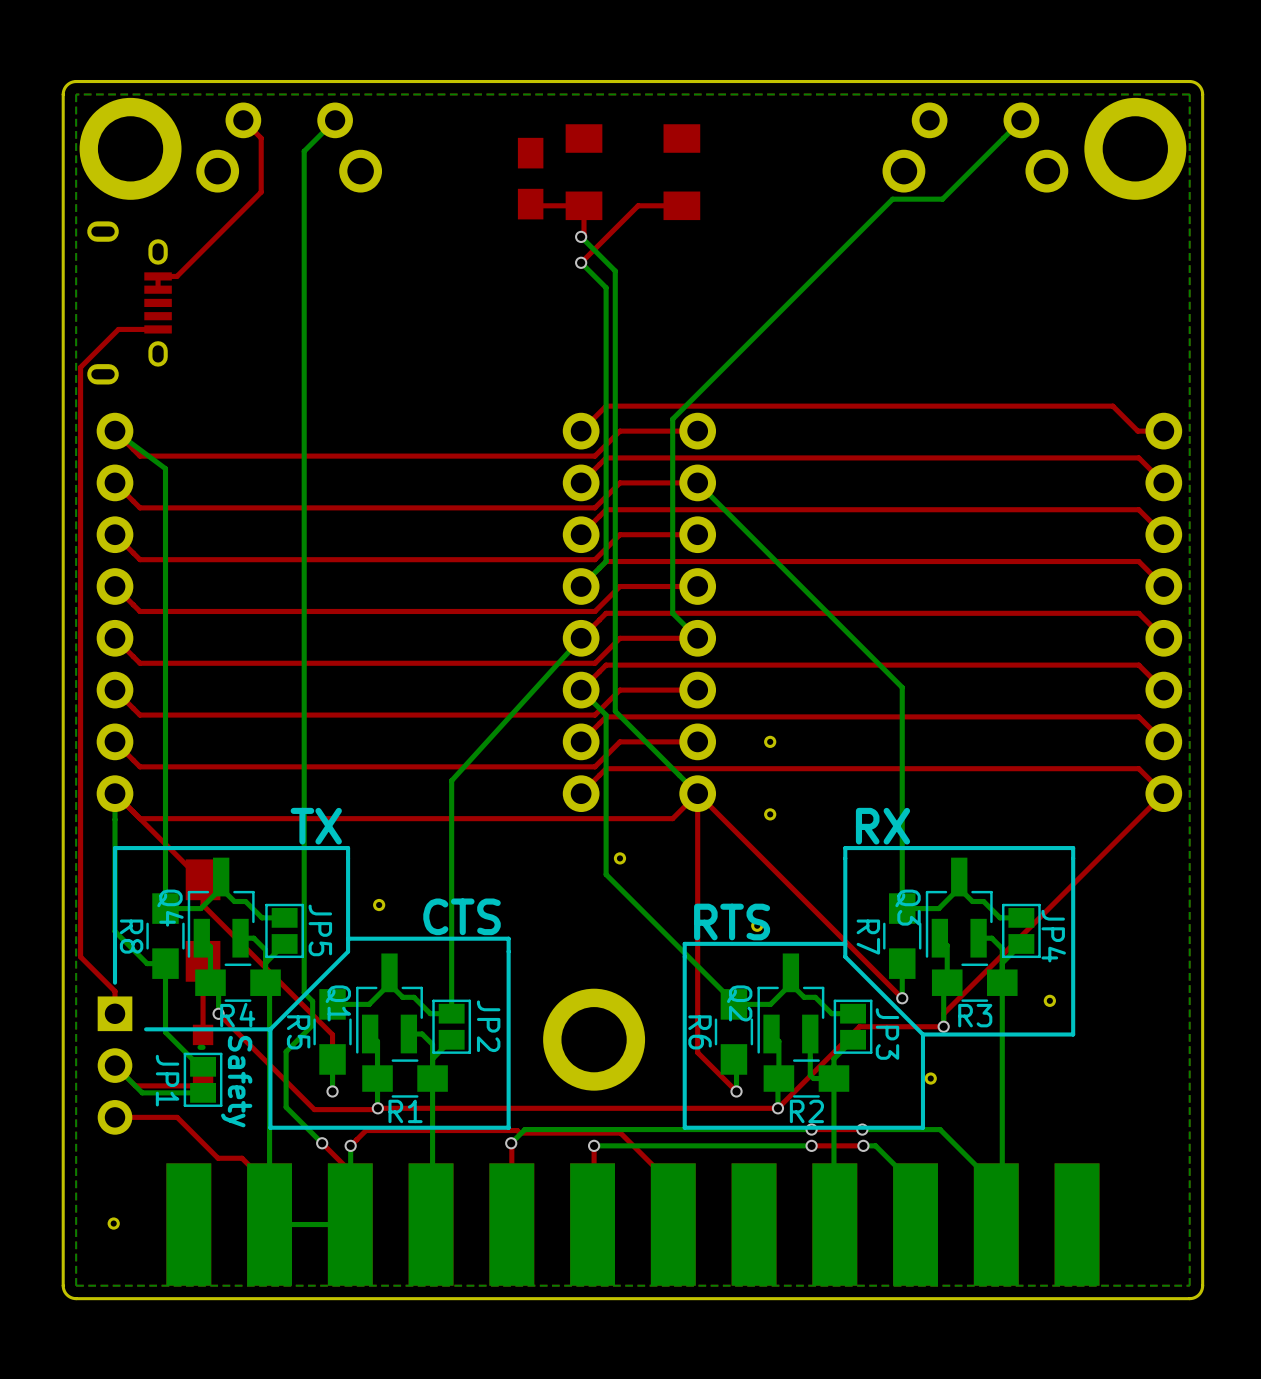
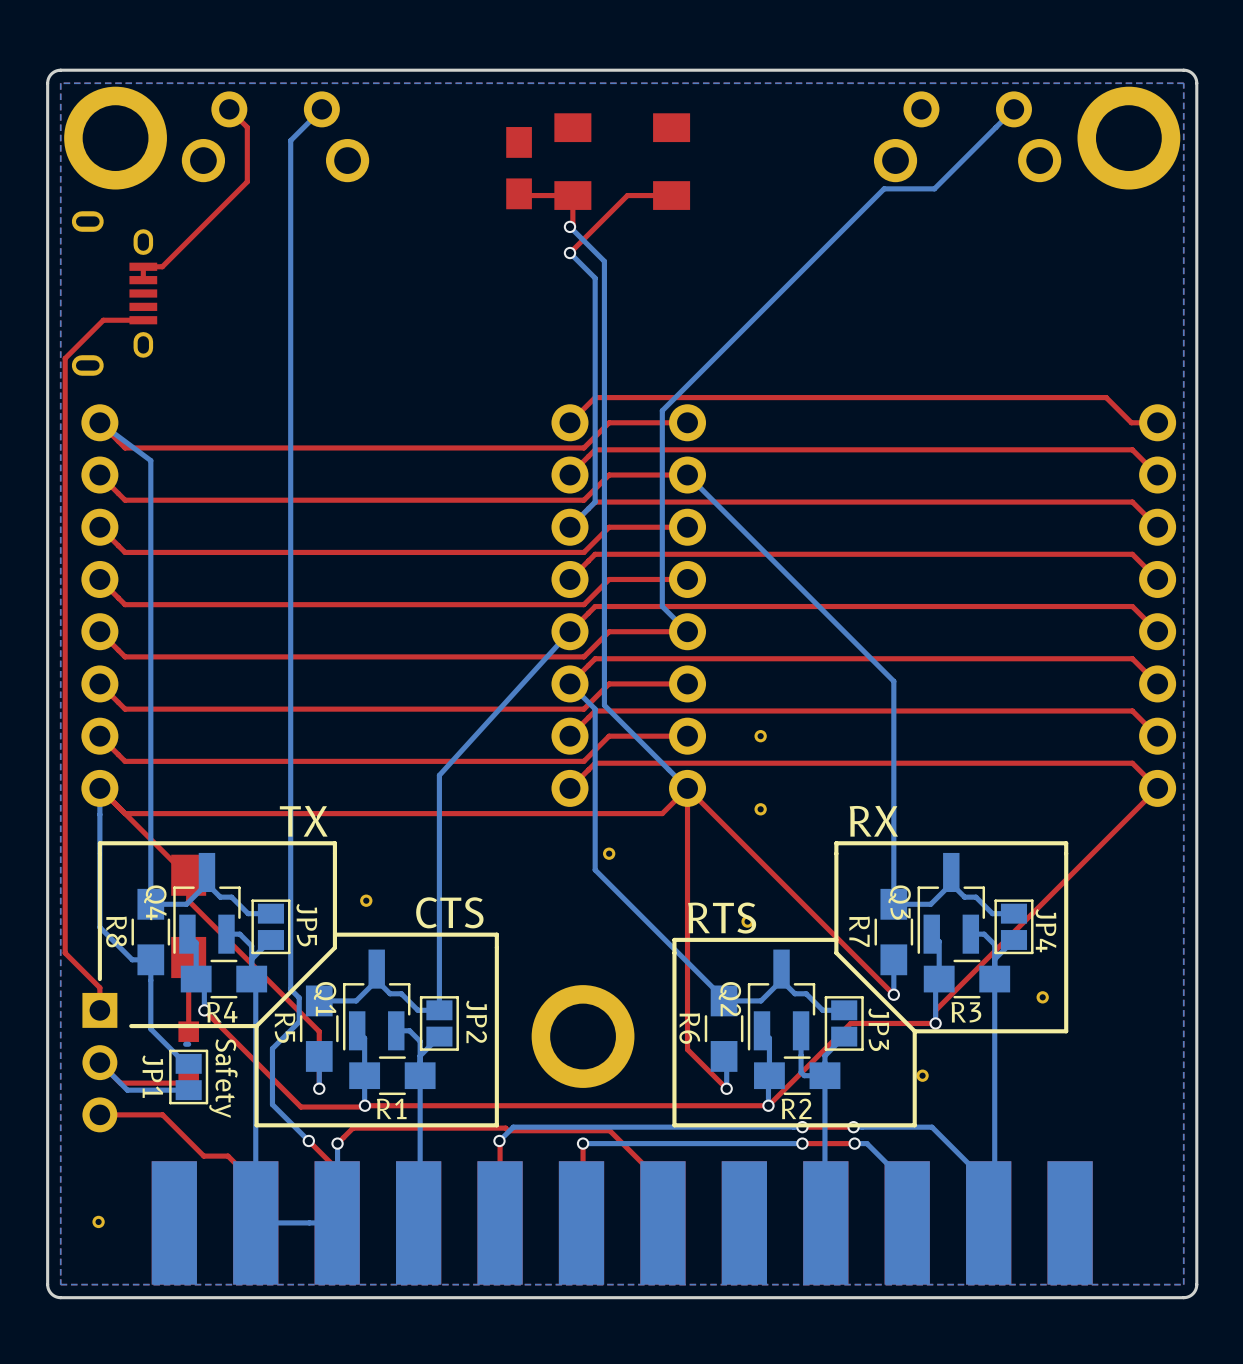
bottom track: (606, 509) (606, 561) (581, 586) -> (595, 502) (569, 527)

